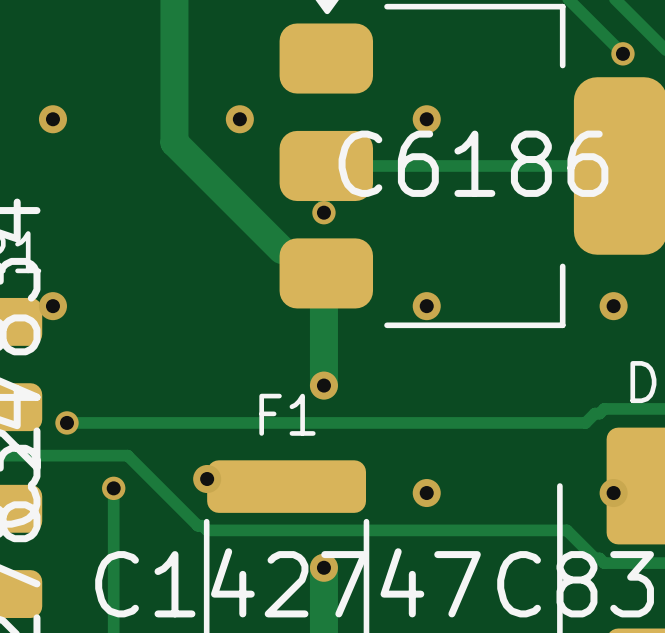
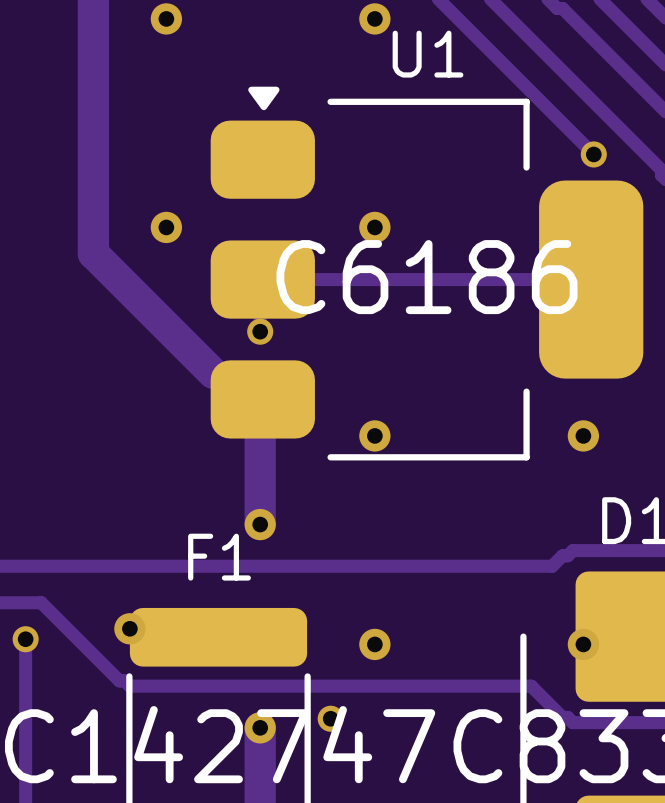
via: none -> (330, 718)

